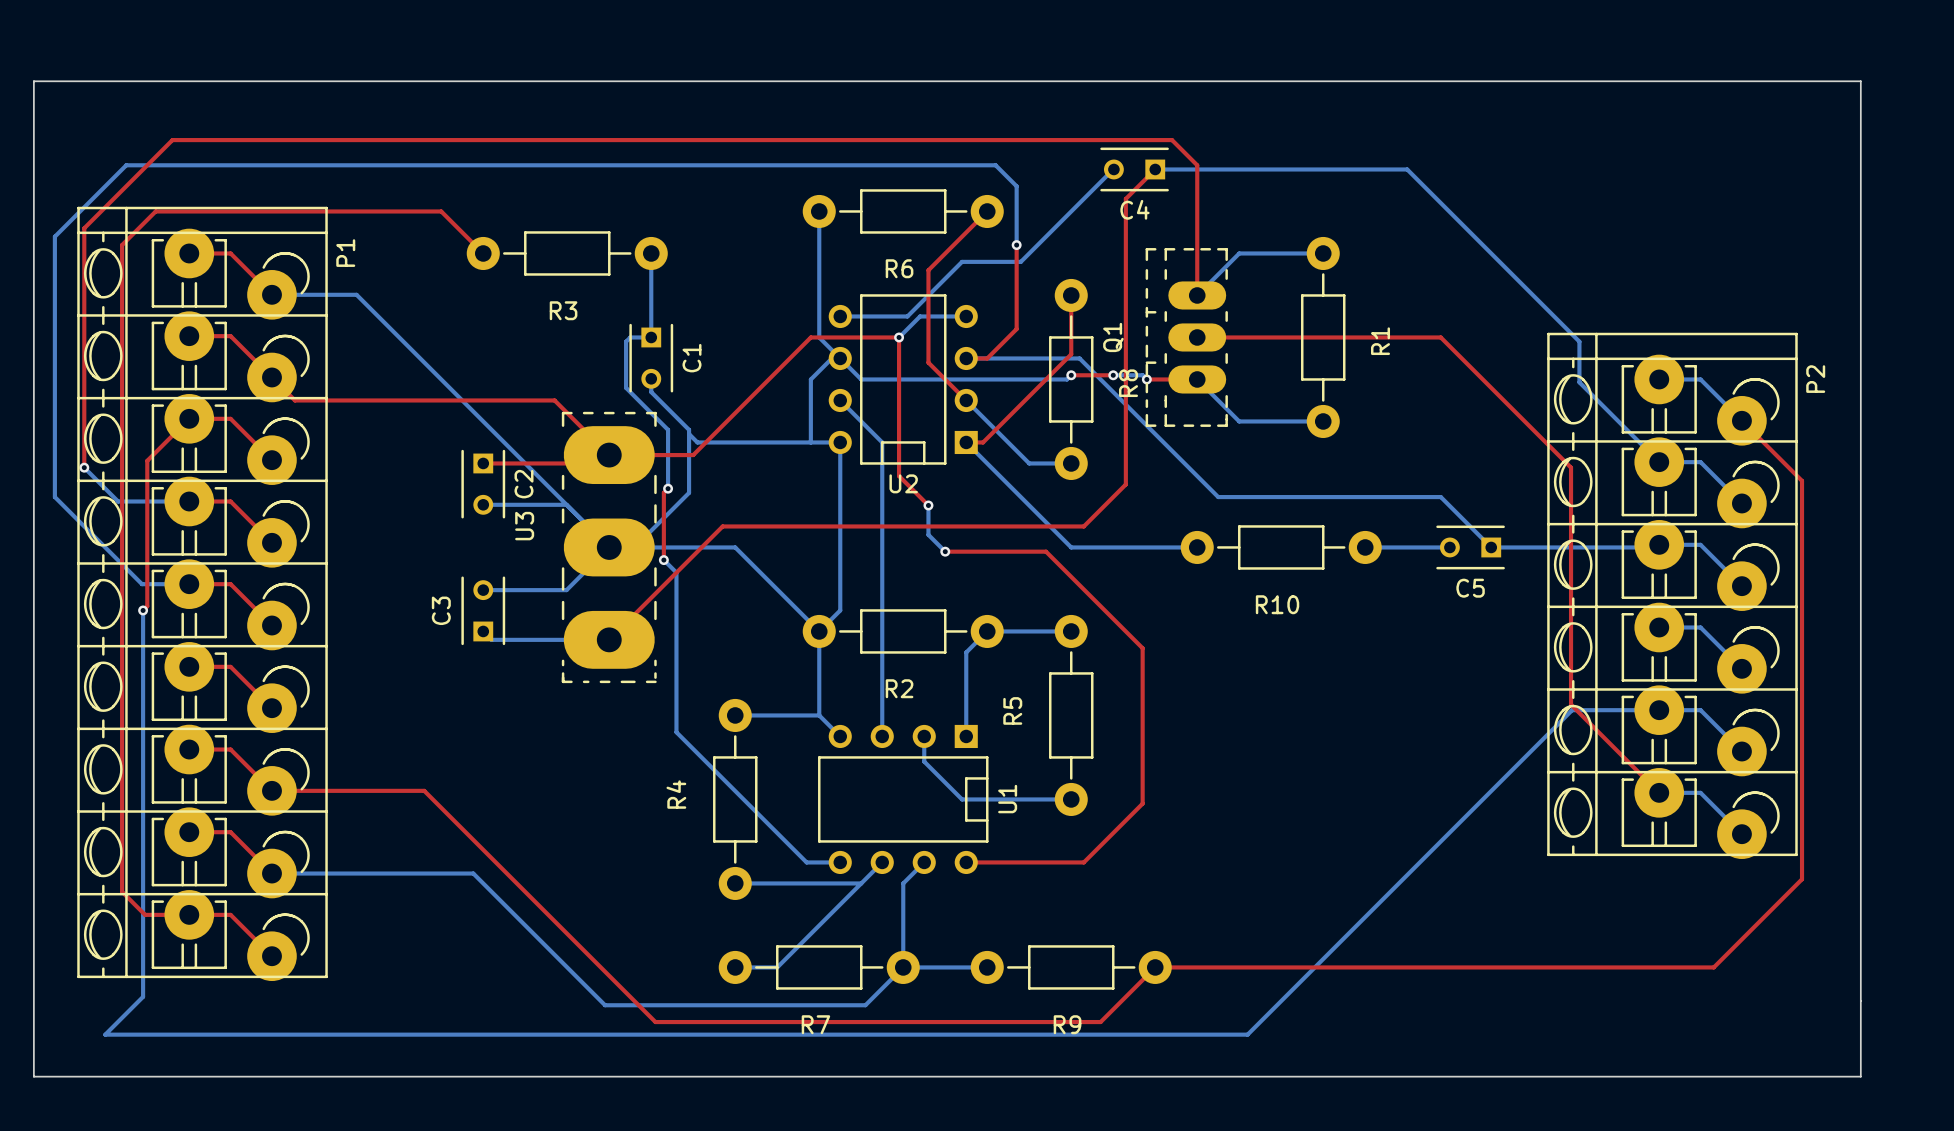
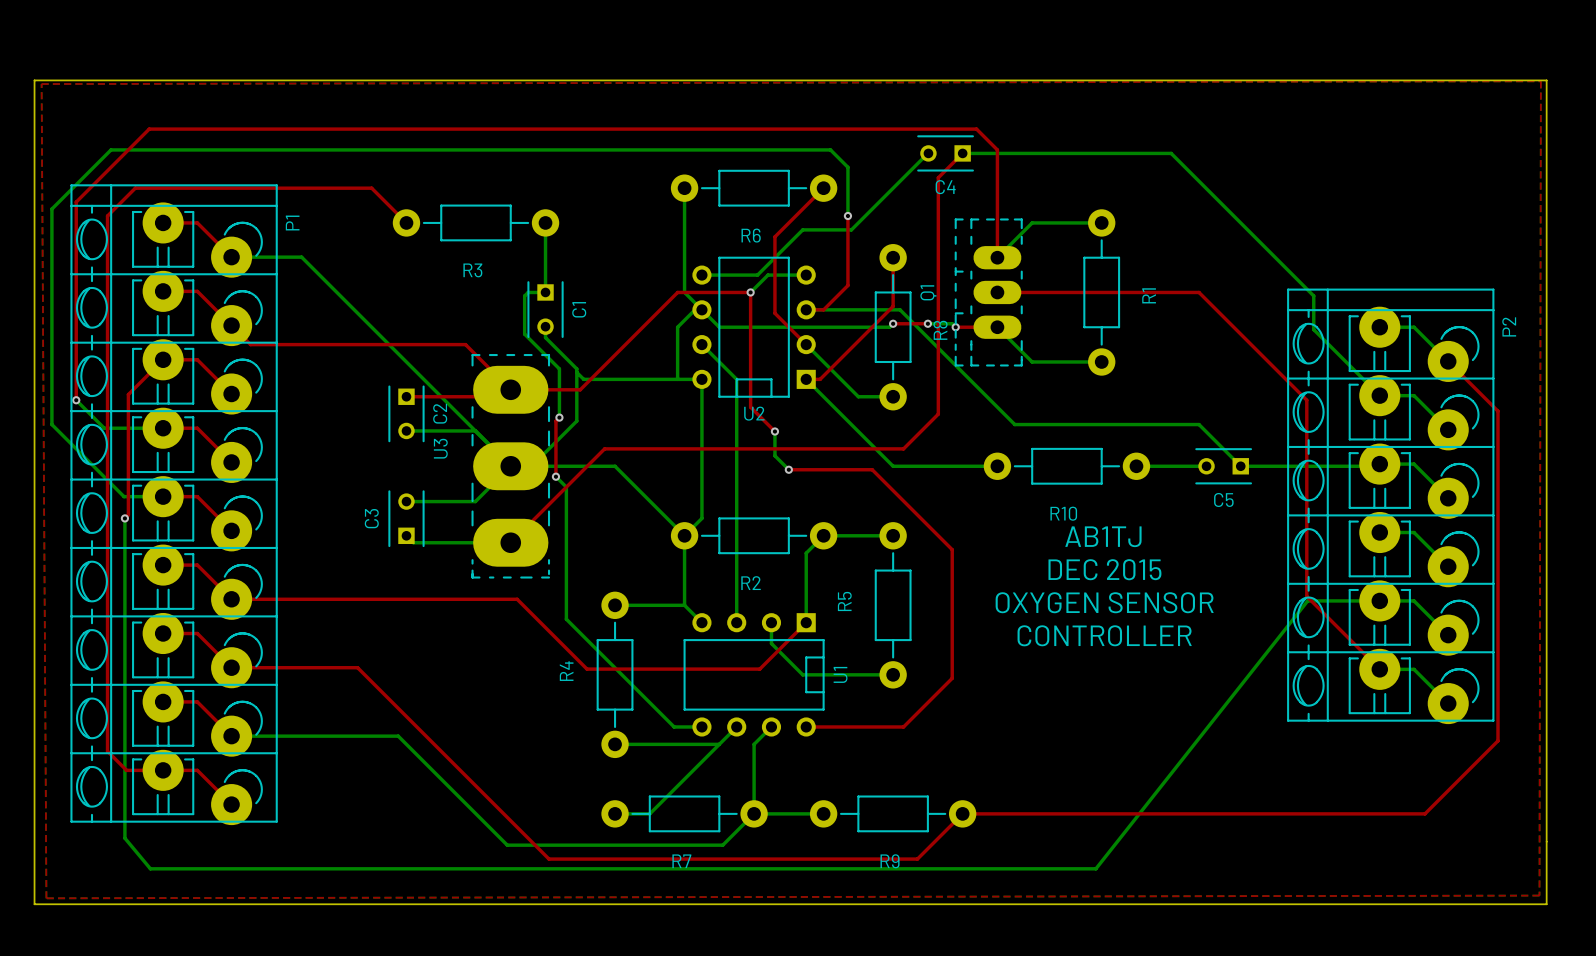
top zone outline: none -> (1540, 81) (1539, 895) (46, 898) (41, 84) (1540, 81)
text: none -> AB1TJ (1103, 536)
text: none -> DEC 2015 (1104, 569)
top track: none -> (231, 599) (517, 599) (586, 669) (759, 669) (806, 622)
bottom track: (1572, 710) (1247, 1034) (105, 1034) (143, 996) -> (1307, 600) (1095, 868) (150, 868) (124, 838)
text: none -> OXYGEN SENSOR (1104, 602)
text: none -> CONTROLLER (1104, 635)

